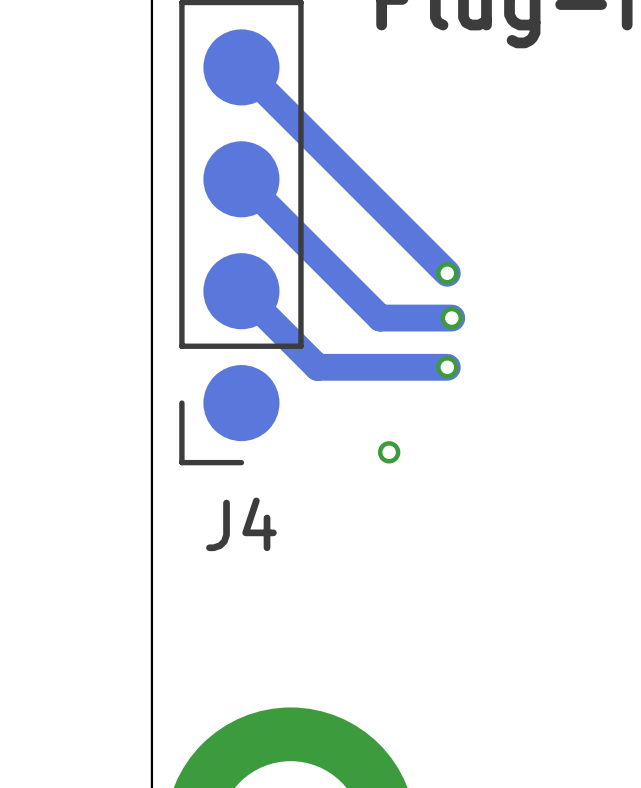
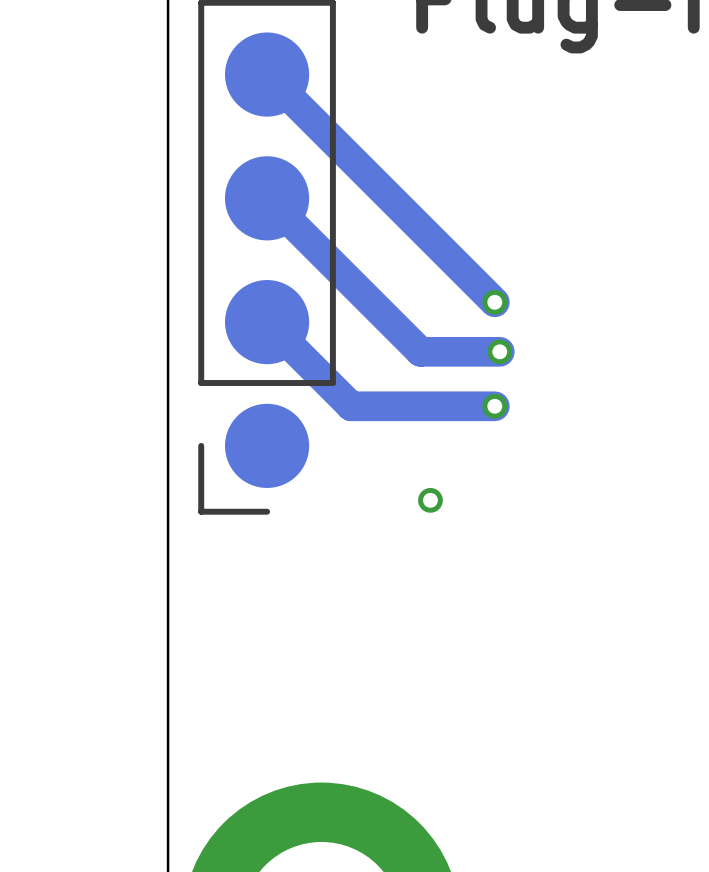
J4 name: J4 (241, 524) -> none

